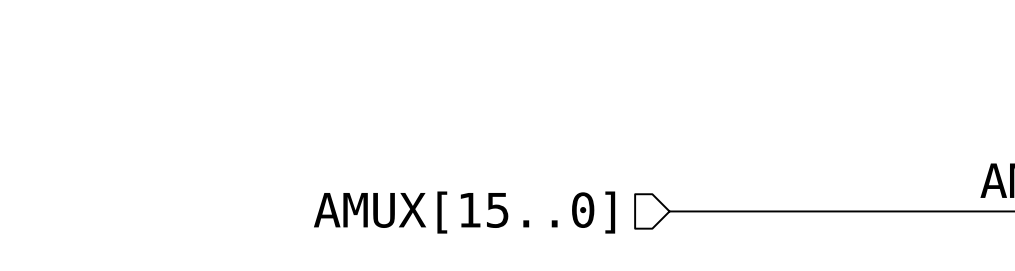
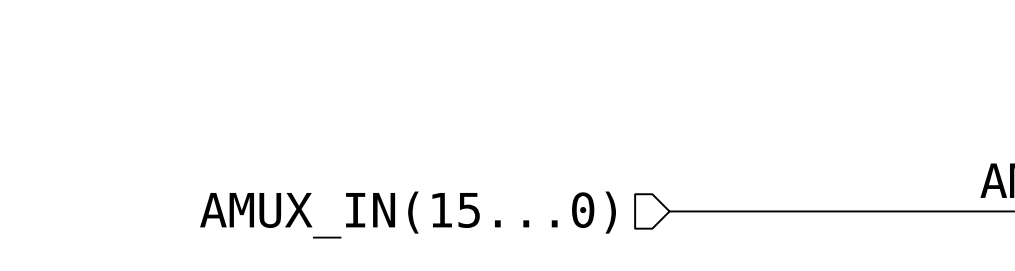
hierarchical label: AMUX[15..0] (464, 212) -> AMUX_IN(15...0) (408, 215)

